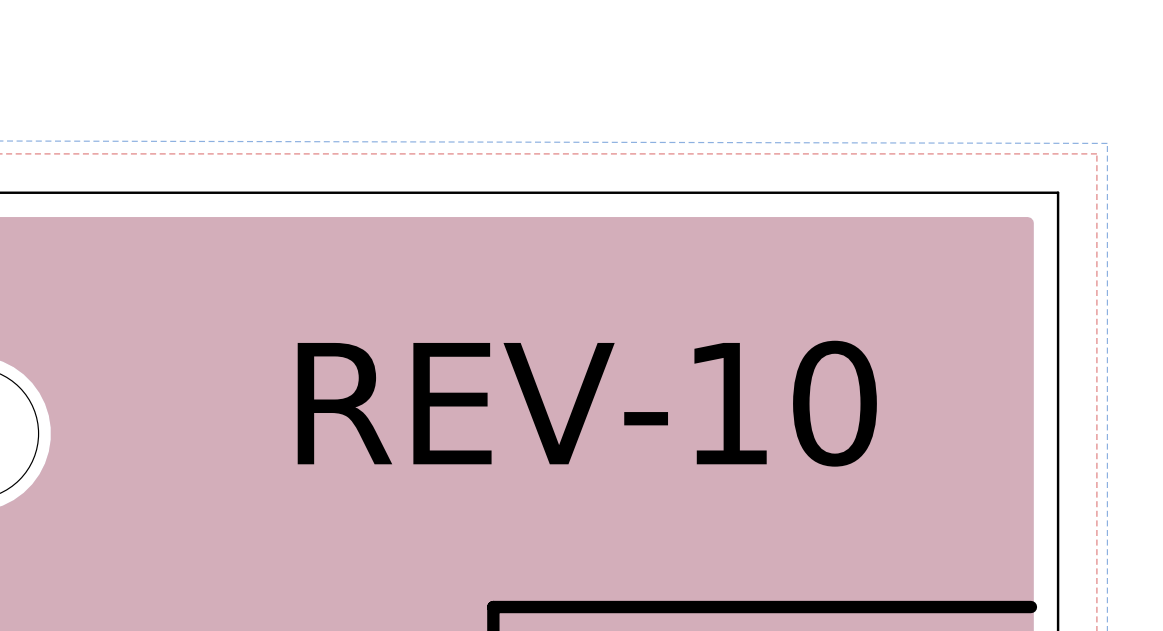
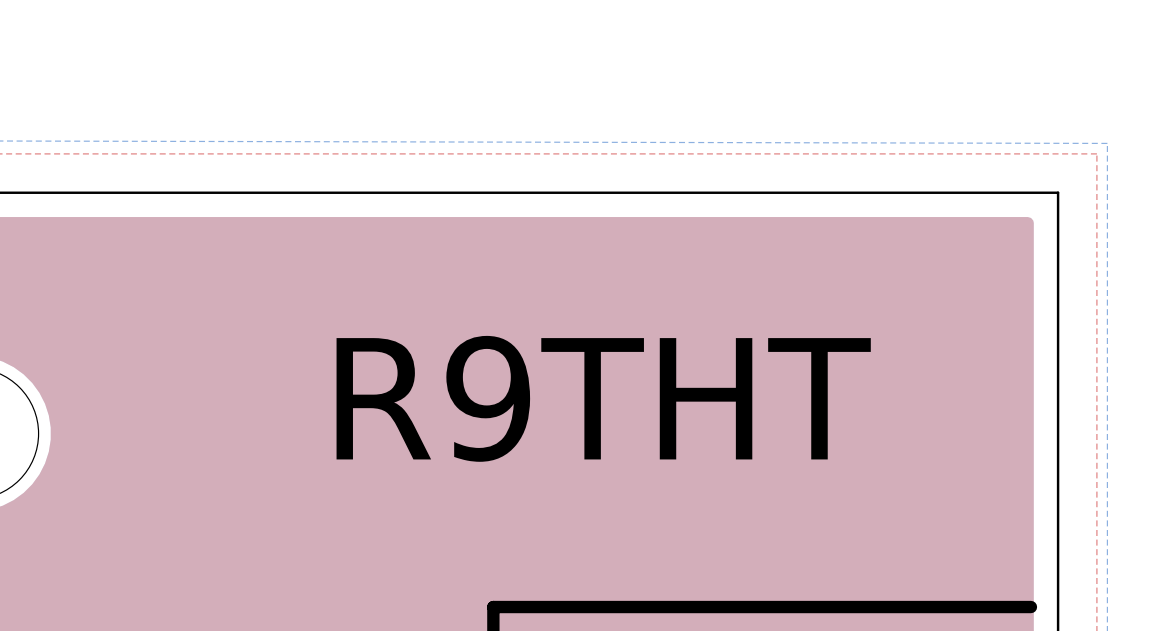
text: REV-10 (587, 403) -> R9THT (603, 398)

